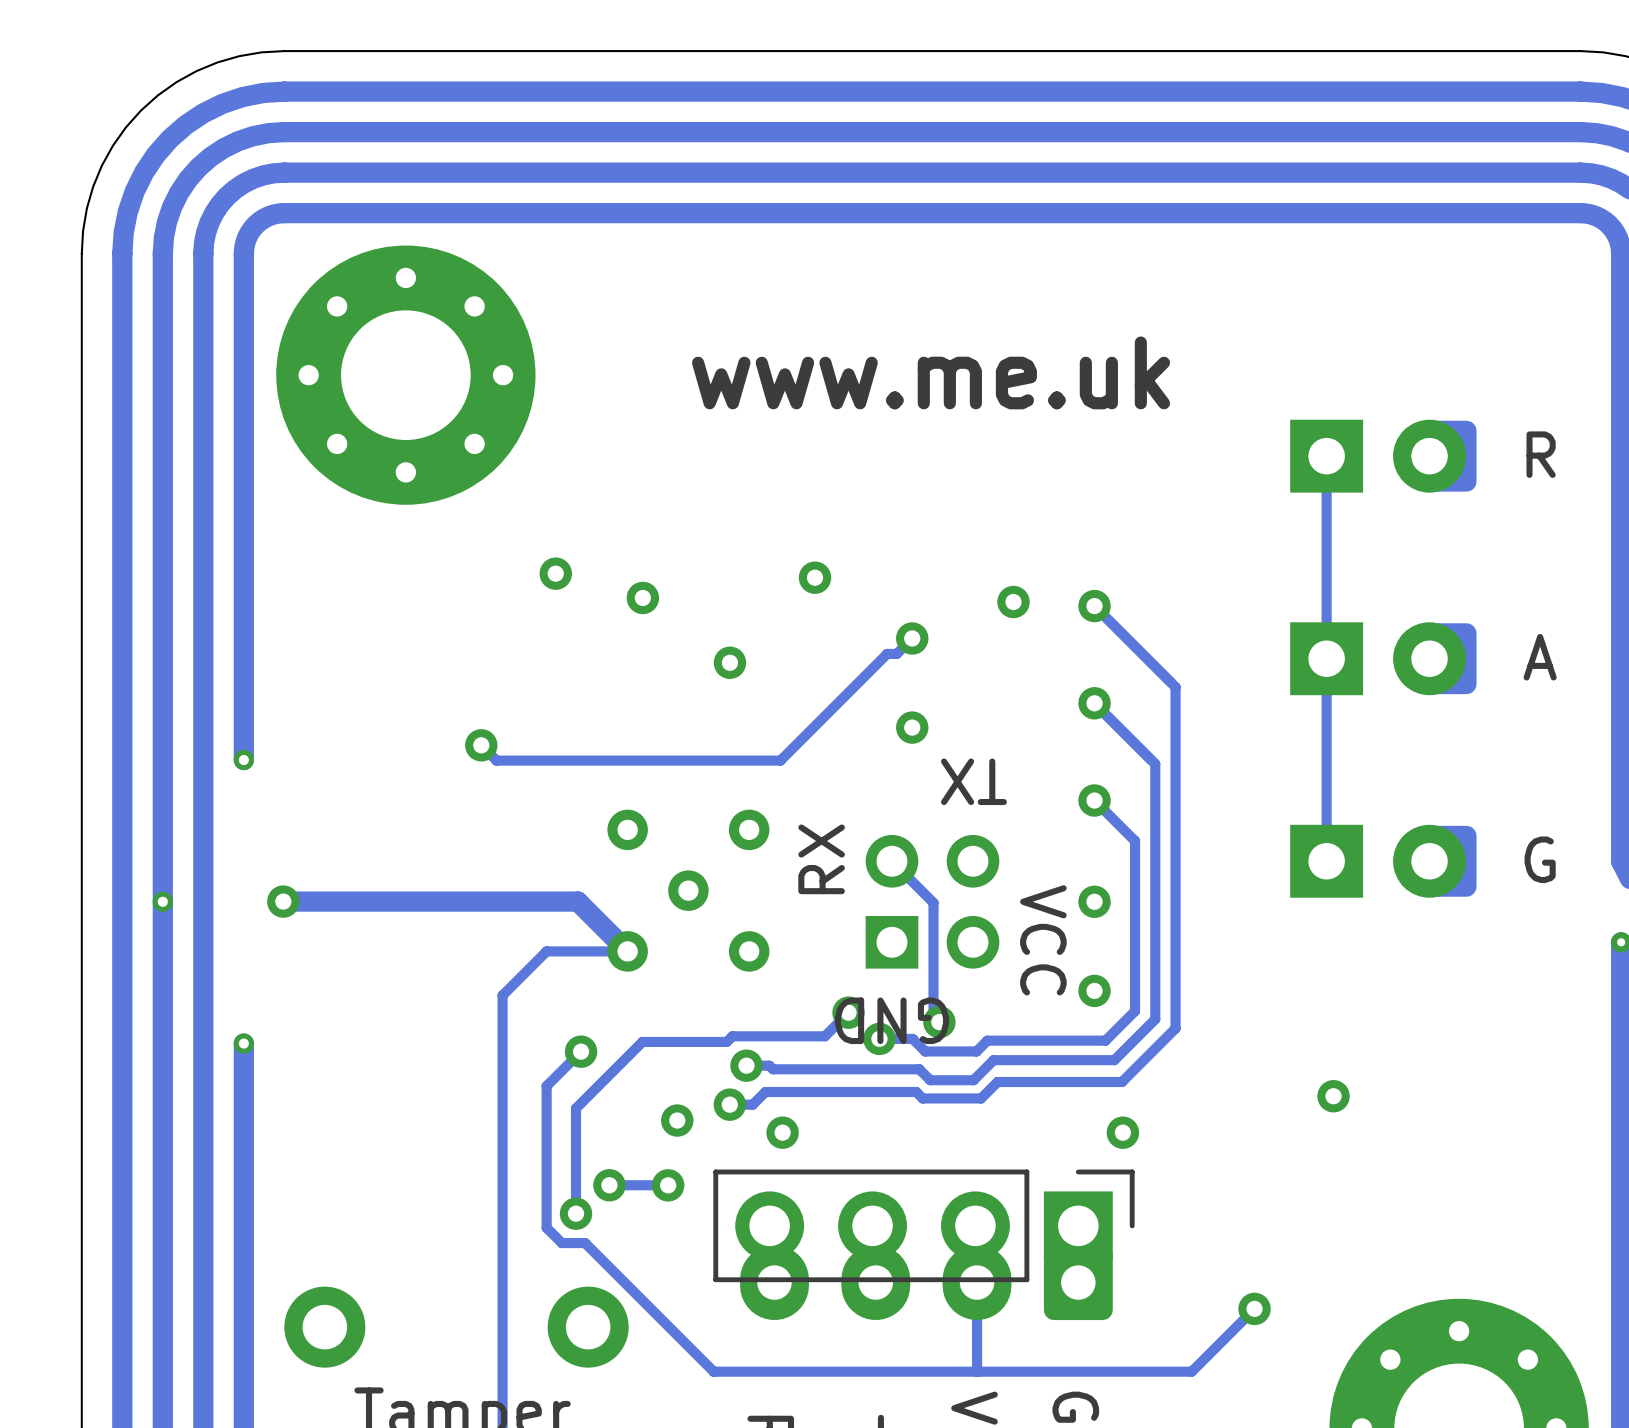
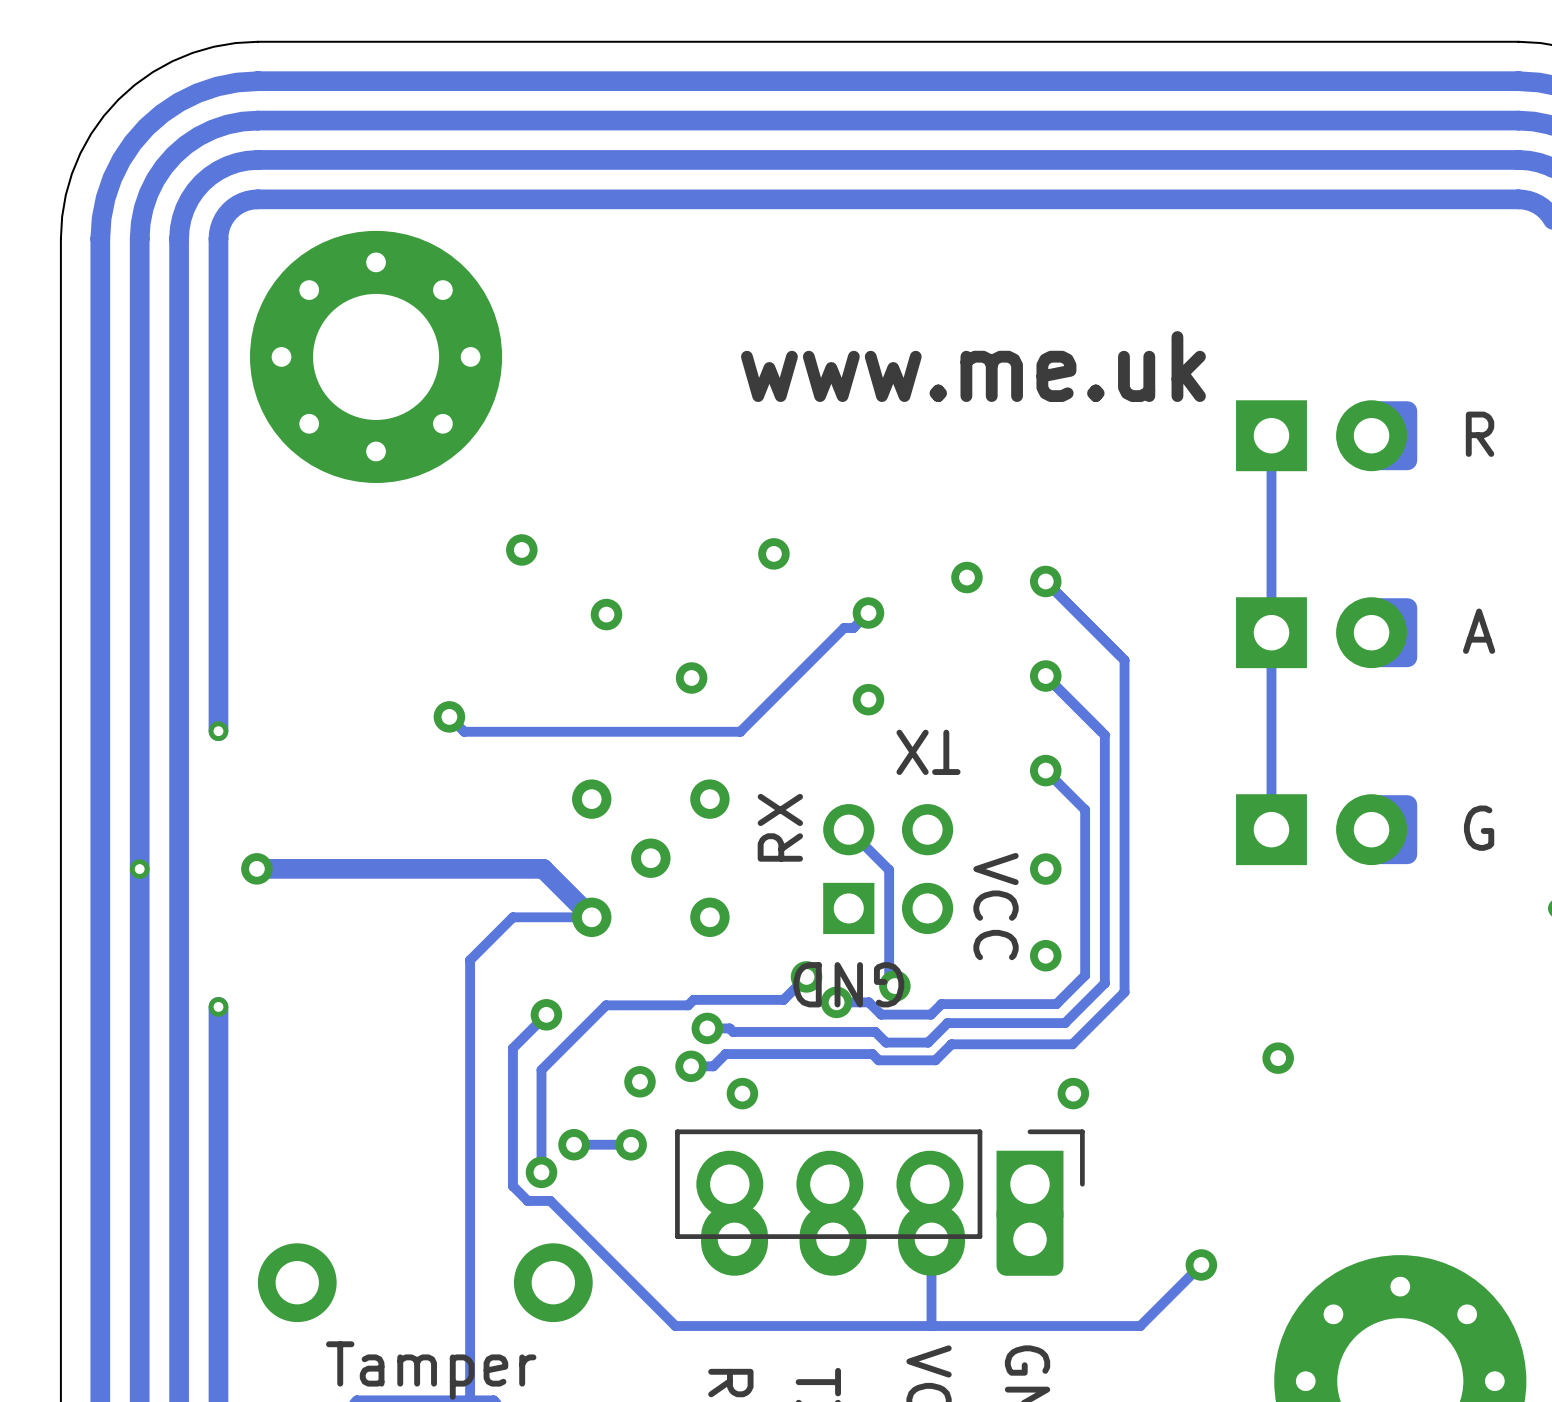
text position: www.me.uk (931, 372) -> www.me.uk (973, 366)
via position: (642, 597) -> (606, 614)
via position: (729, 662) -> (691, 677)

